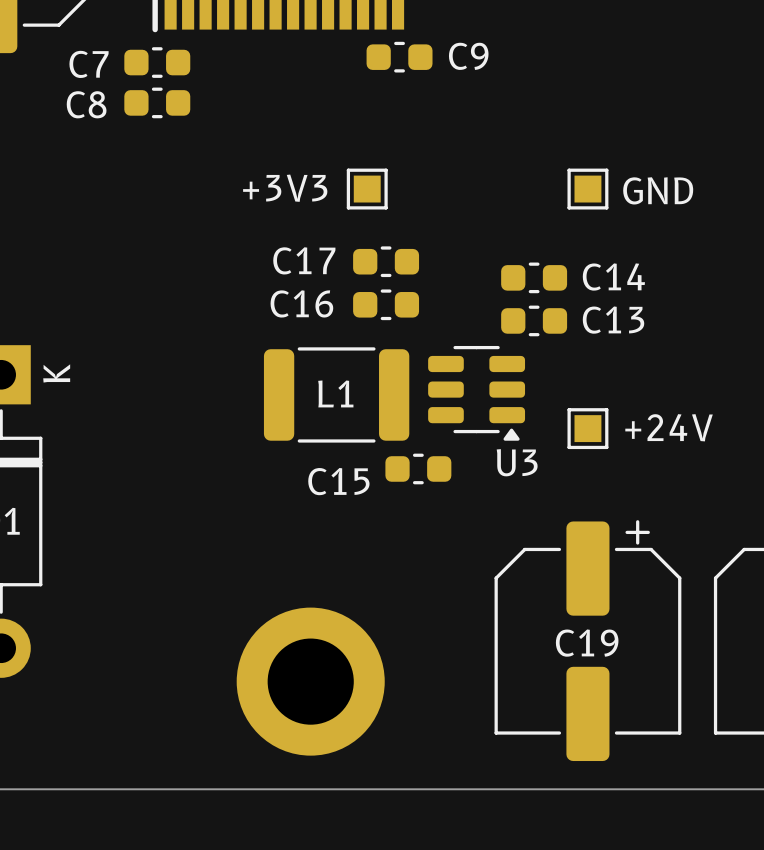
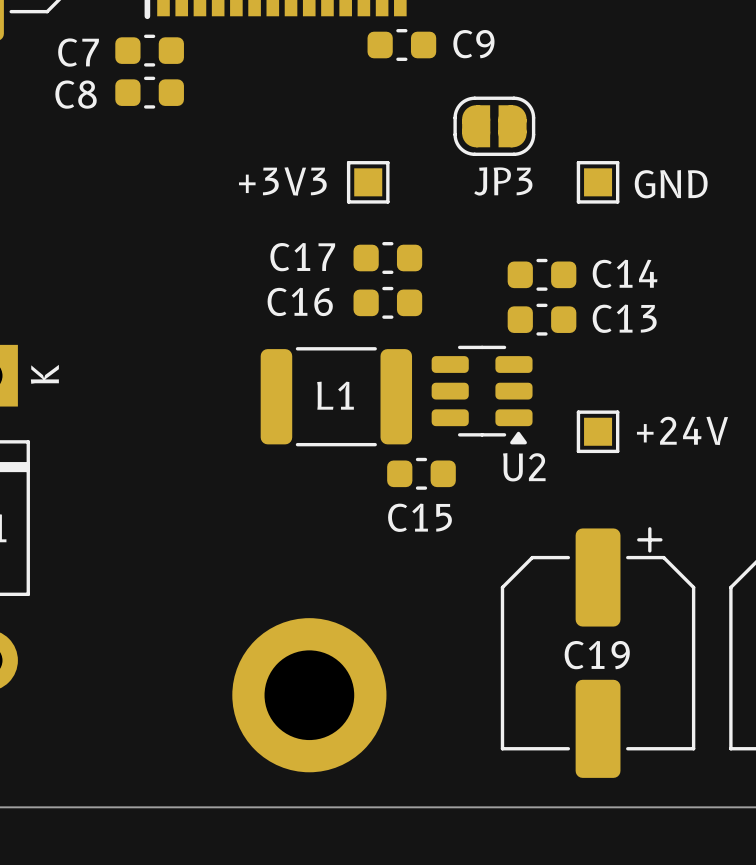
JP3: none -> (494, 126)
U3 name: U3 (517, 462) -> U2 (524, 467)
C15 name position: C15 (338, 481) -> C15 (419, 517)

